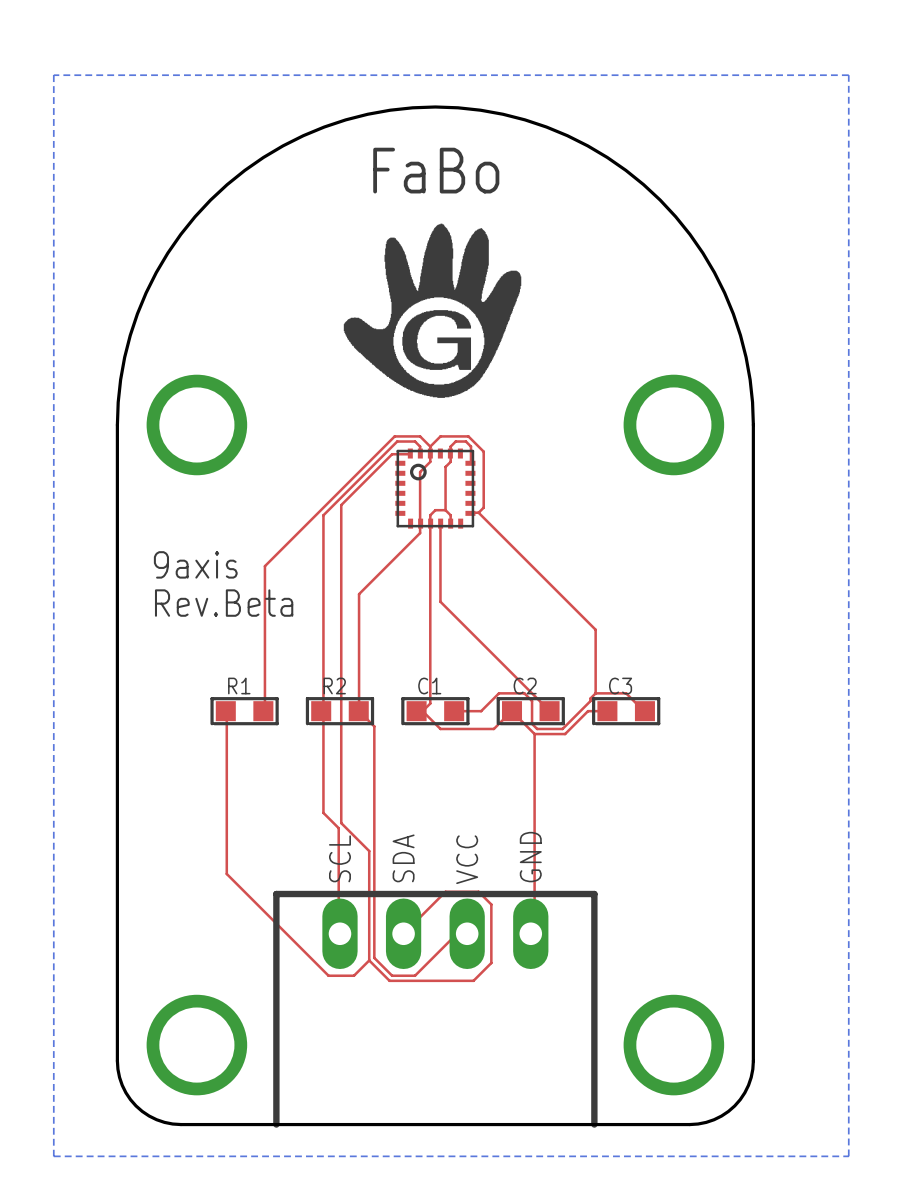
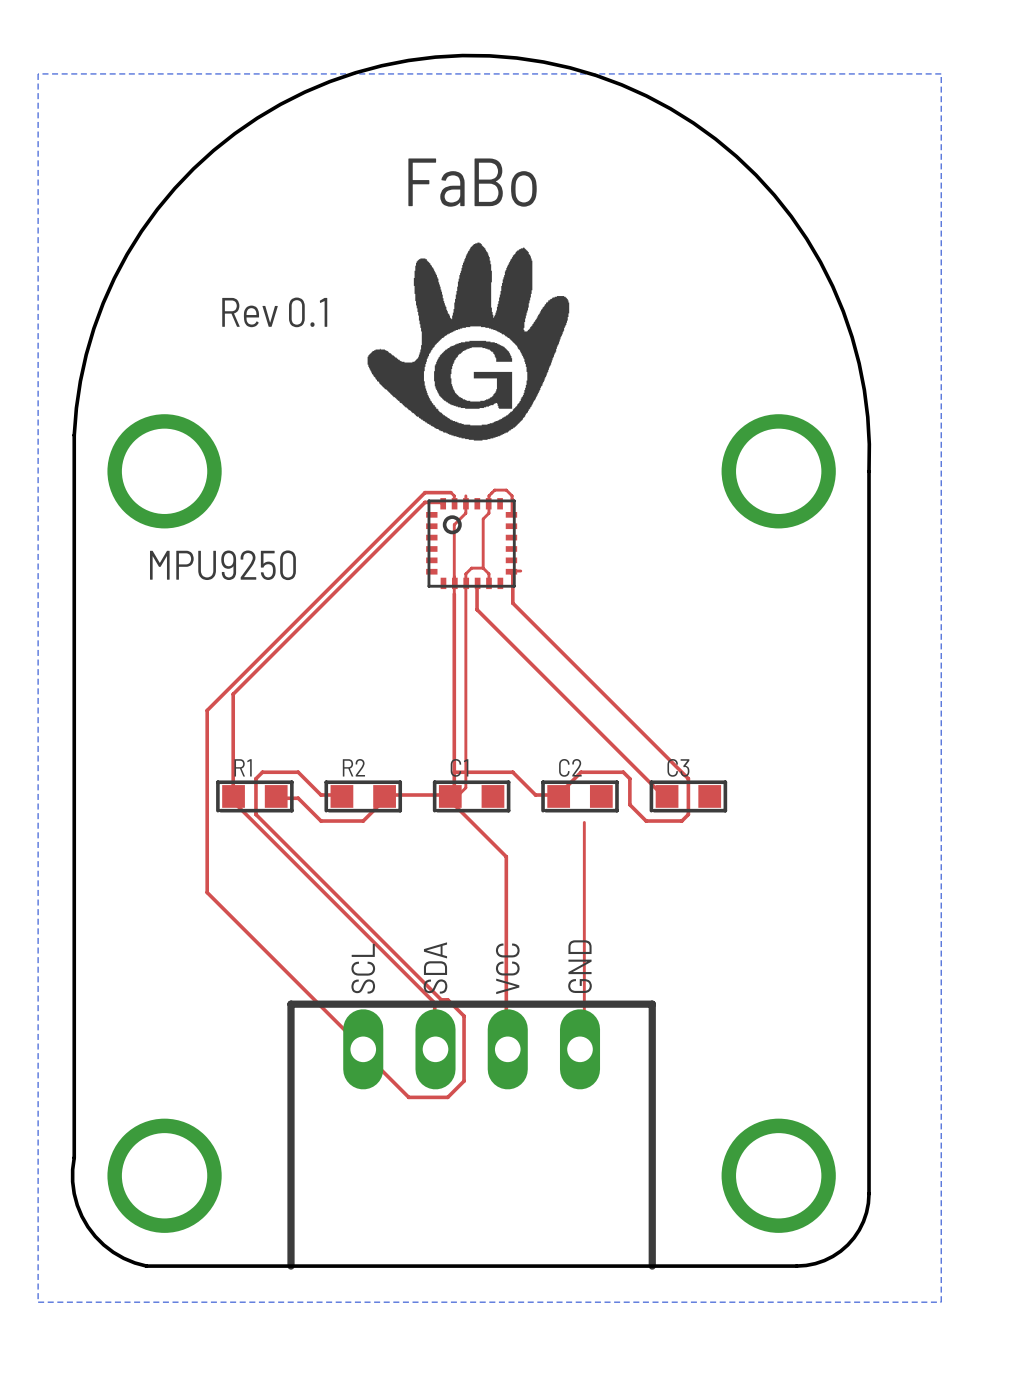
part footprint: [115, 105, 755, 1128] -> [70, 53, 872, 1270]
text: none -> Rev 0.1 (274, 312)
top track: (417, 443) (415, 441) (397, 441) (323, 515) (323, 812) (338, 828) (339, 933) -> (451, 492) (425, 492) (207, 710) (207, 892) (363, 1048) (363, 1051) (408, 1097) (447, 1097) (464, 1081) (464, 1016) (447, 999) (441, 999) (255, 814) (255, 778) (262, 772) (298, 772) (320, 795) (339, 796)
top track: (410, 453) (392, 454) (341, 505) (341, 823) (369, 851) (369, 960) -> (443, 504) (441, 502) (425, 502) (233, 694) (233, 795) (229, 798) (434, 1003) (435, 1049)
text: none -> MPU9250 (222, 565)
top track: none -> (509, 571) (512, 573) (512, 603) (688, 778) (688, 814) (681, 821) (646, 821) (629, 804) (629, 778) (623, 772) (581, 772) (555, 796) (535, 795) (512, 772) (454, 772)
top track: (440, 523) (440, 601) (549, 711) -> (477, 582) (477, 609) (664, 796)
top track: (420, 533) (359, 594) (359, 711) (374, 726) (374, 957) (392, 975) (415, 975) (455, 935) (467, 933) -> (447, 796) (506, 856) (507, 1049)
top track: none -> (454, 594) (454, 788) (447, 796)
text: 9axis (195, 564) -> none
text: Rev.Beta (224, 603) -> none
top track: (595, 693) (626, 693) (644, 711) -> none
top track: (595, 693) (562, 728) (537, 728) (532, 723) (532, 700) (524, 693) (498, 693) (481, 711) (454, 711) -> none
top track: (595, 693) (595, 629) (478, 512) (483, 507) (483, 451) (468, 436) (440, 436) (430, 446) (420, 436) (394, 436) (264, 566) (264, 711) (263, 711) -> none
top track: (225, 711) (226, 873) (328, 975) (353, 975) (369, 960) -> none
top track: none -> (279, 796) (281, 798) (298, 798) (320, 821) (363, 821) (389, 795) (447, 796)
top track: (416, 711) (422, 711) (440, 728) (493, 728) (511, 711) (534, 734) (565, 734) (588, 711) (607, 711) -> none
top track: (403, 933) (445, 891) (478, 891) (491, 904) (491, 963) (473, 980) (389, 980) (369, 960) -> none

